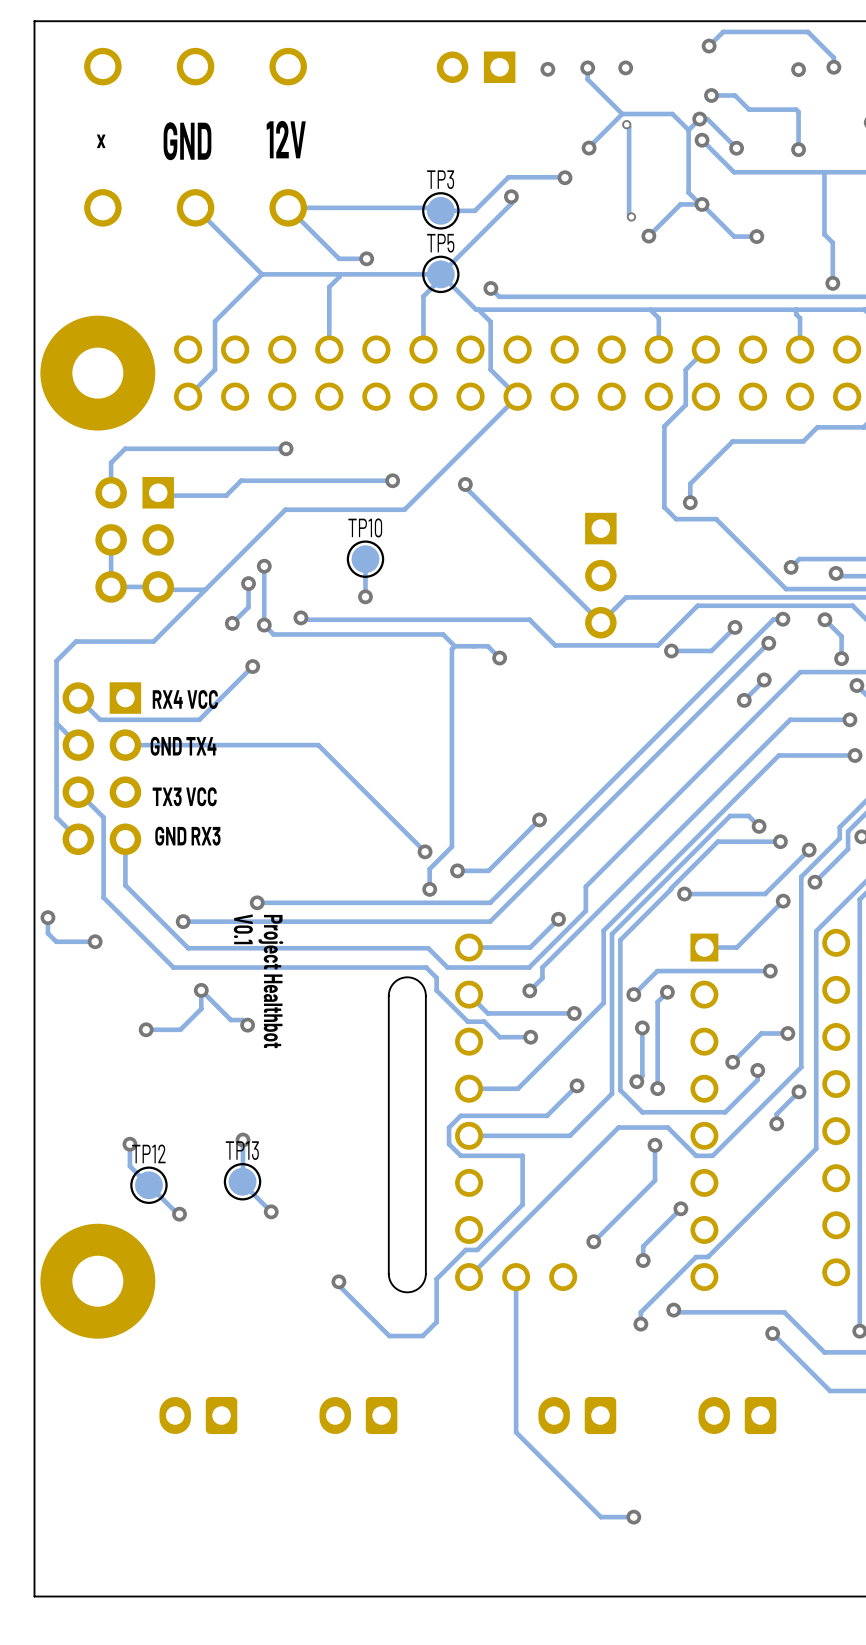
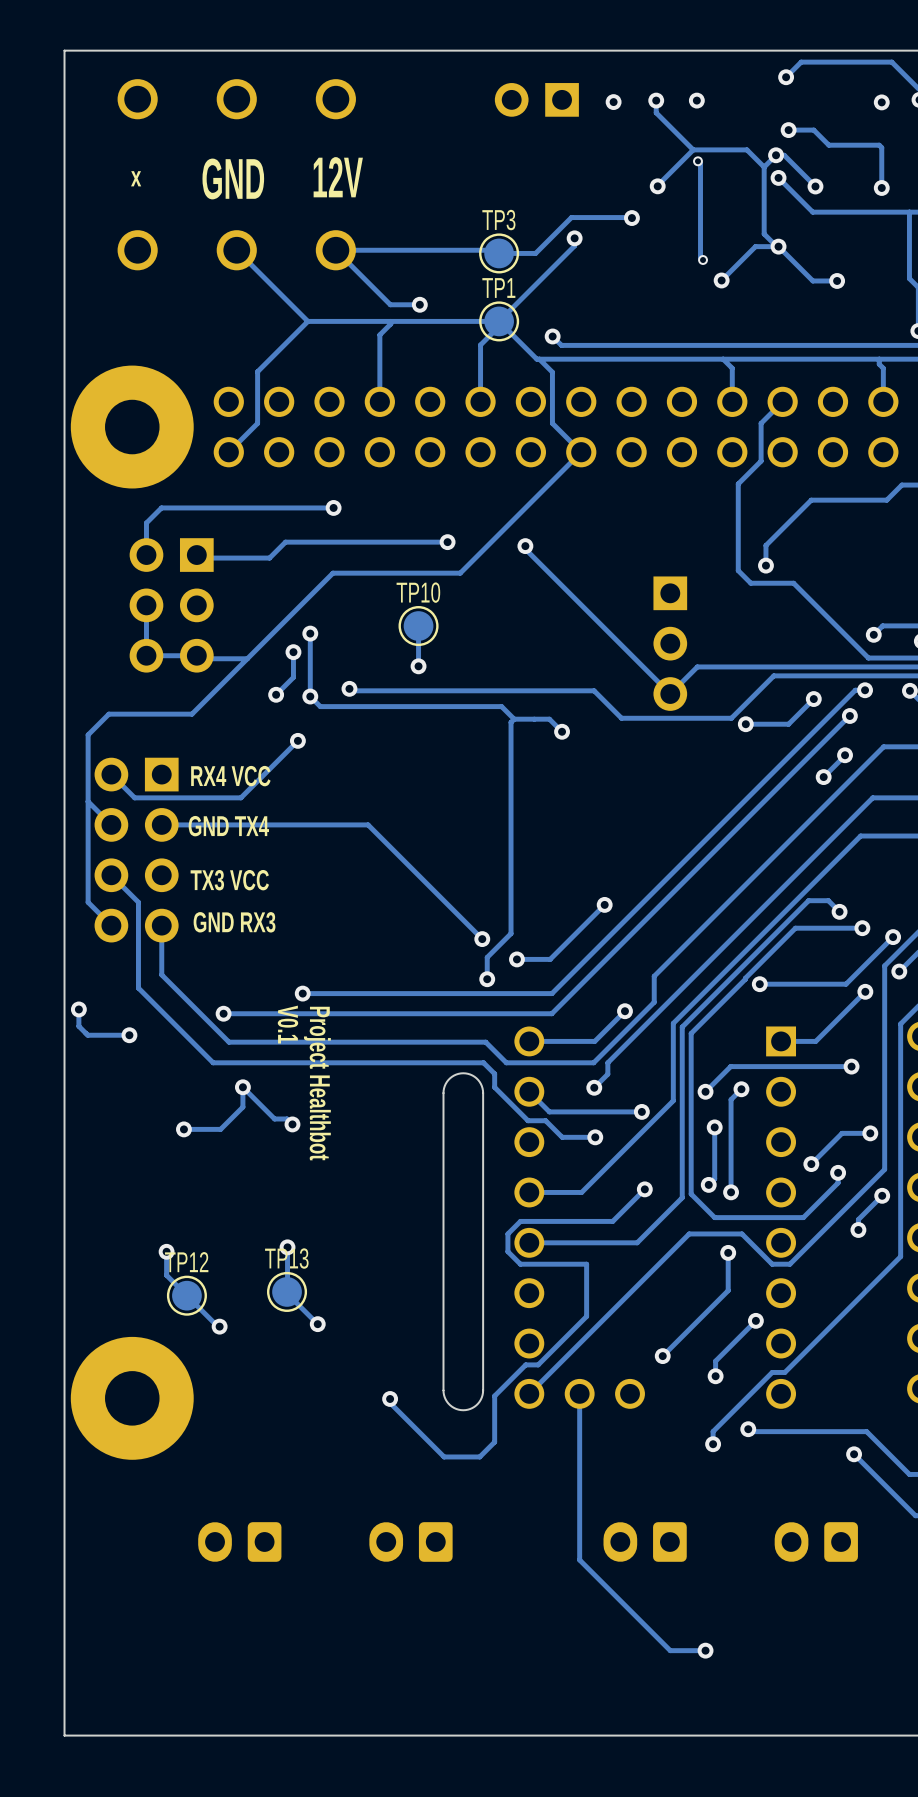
TP5 name: TP5 (440, 243) -> TP1 (498, 288)

